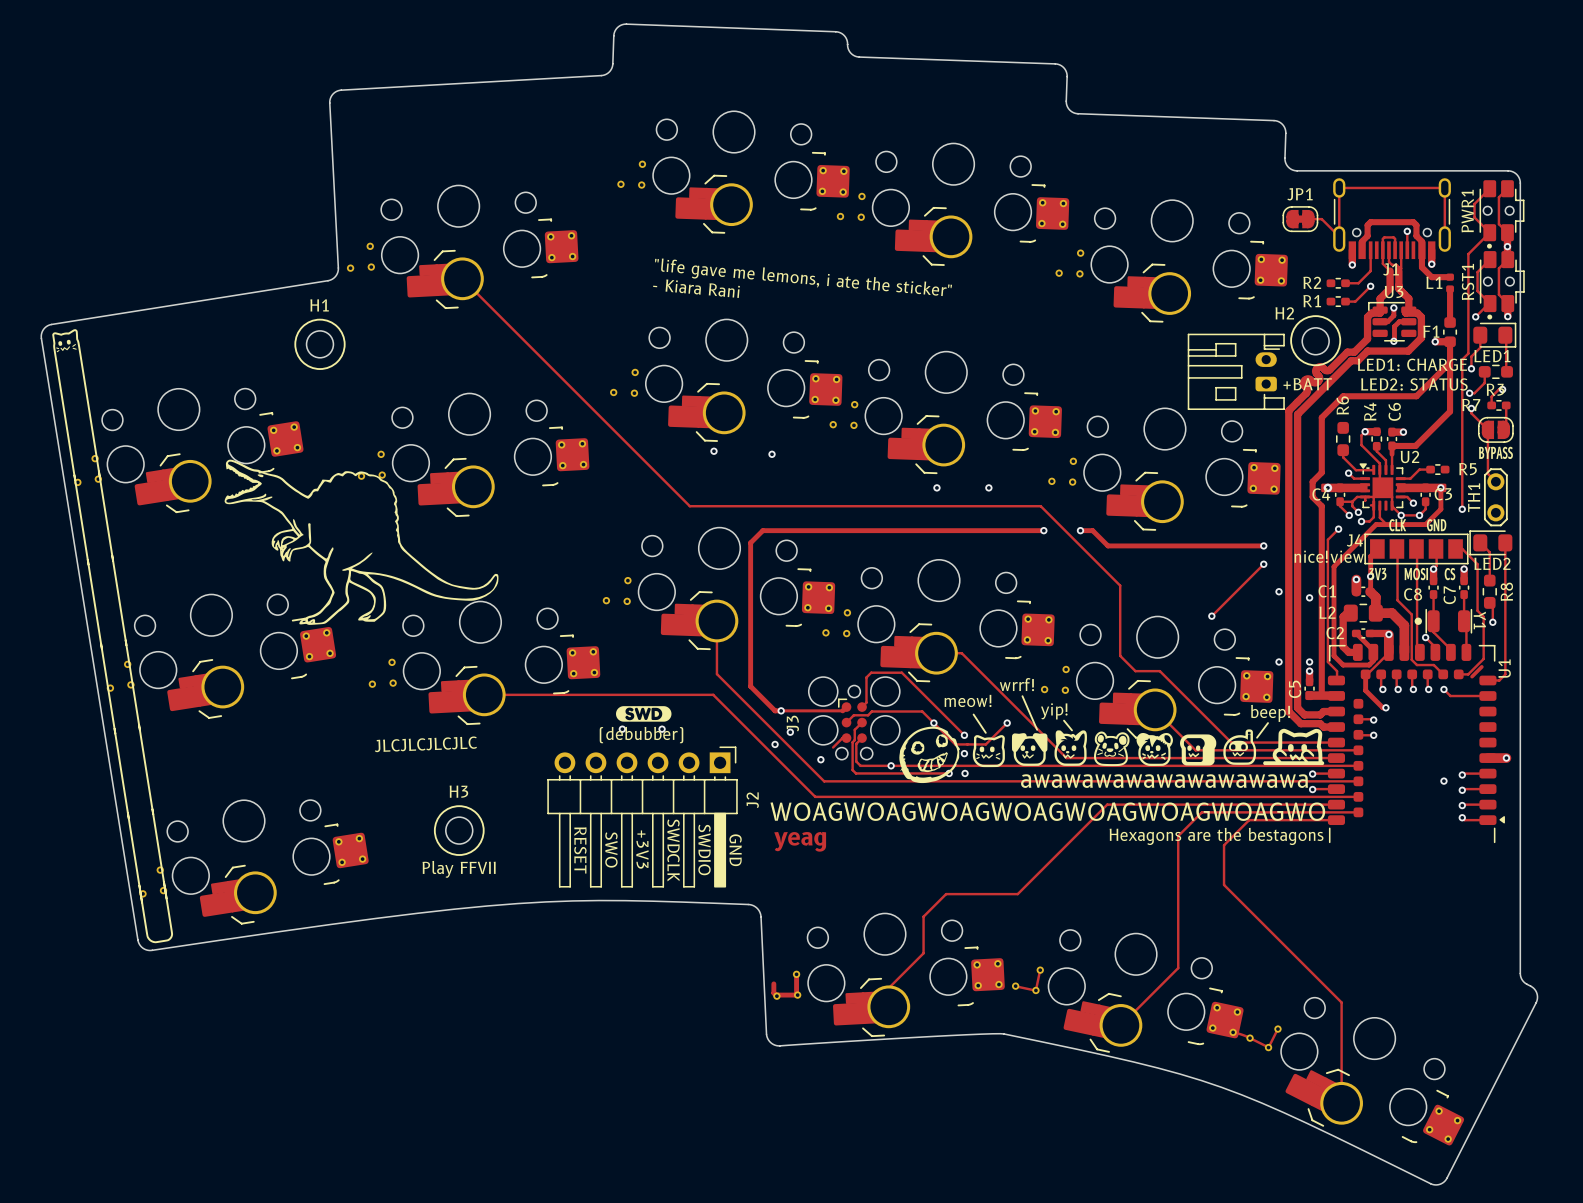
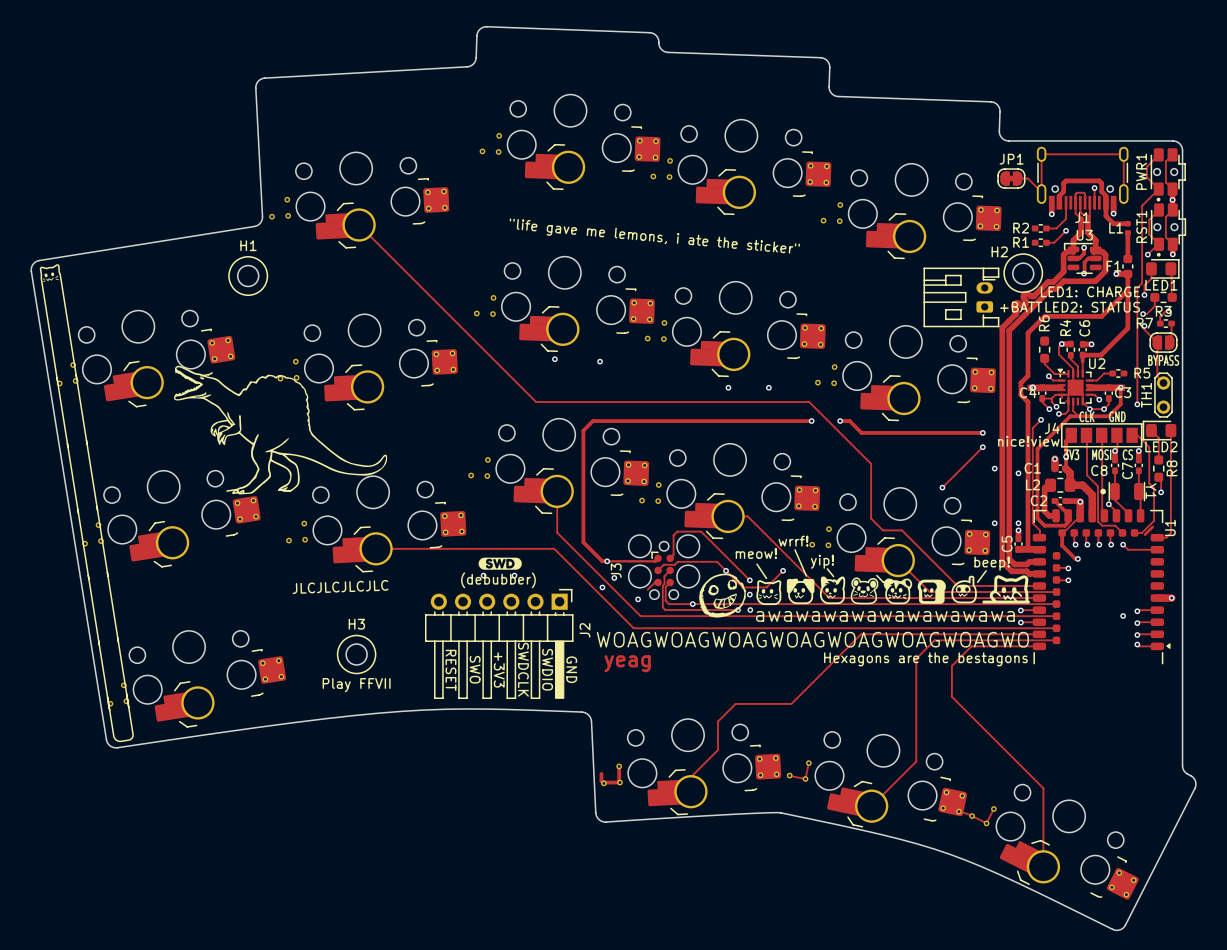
text position: "life gave me lemons, i ate the sticker" (803, 277) -> "life gave me lemons, i ate the sticker" (654, 235)
text: - Kiara Rani (696, 288) -> none

